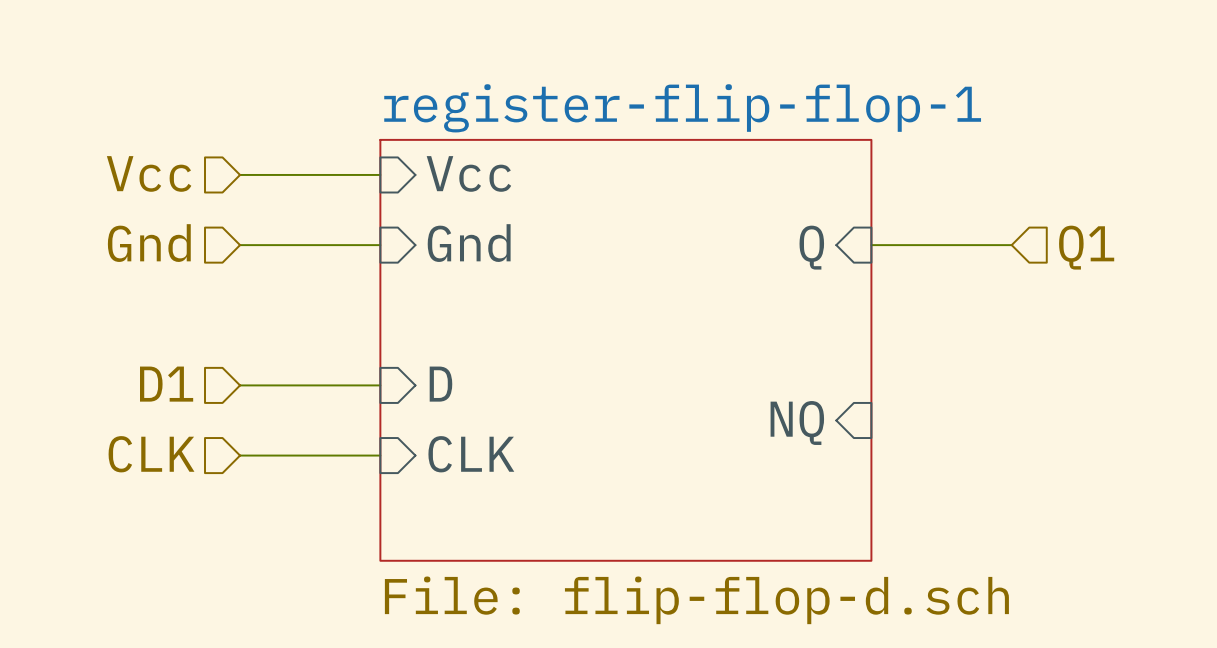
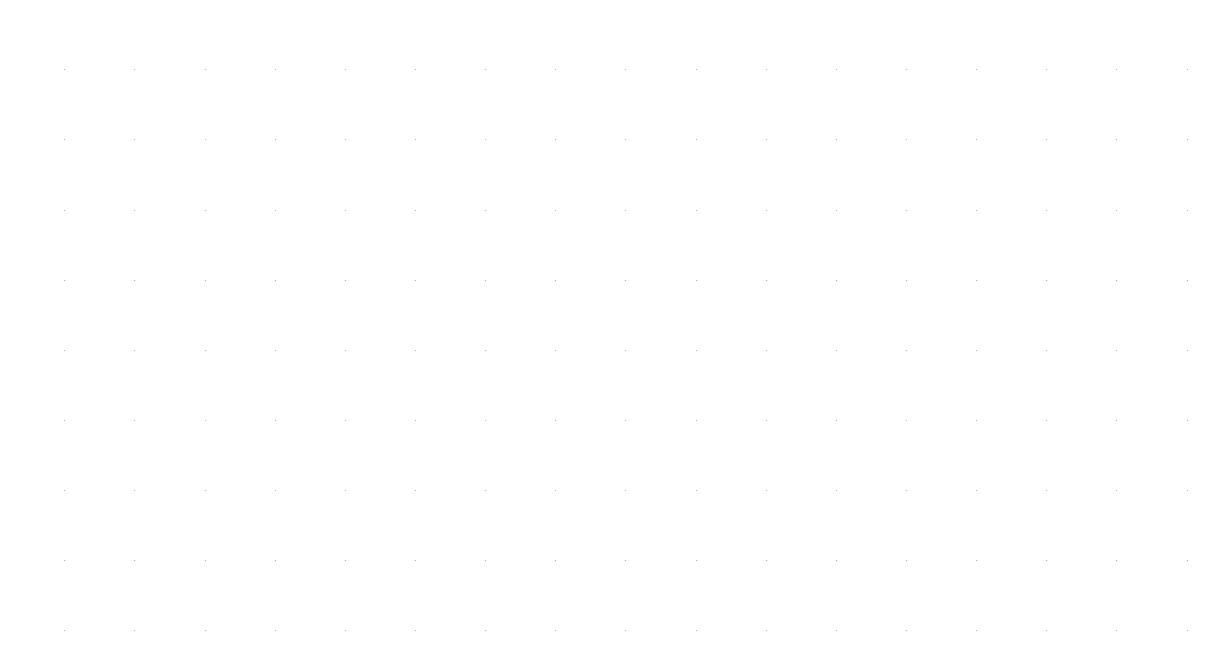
hierarchical label: Vcc (149, 173) -> none
sheet pin: Vcc (468, 173) -> none
wire: (240, 174) (380, 174) -> none
hierarchical label: Gnd (149, 243) -> none
sheet pin: Gnd (469, 243) -> none
wire: (240, 245) (380, 245) -> none
wire: (871, 245) (1011, 245) -> none
sheet pin: Q (811, 247) -> none
hierarchical label: Q1 (1086, 247) -> none
sheet register-flip-flop-1: File: flip-flop-d.sch (625, 350) -> none
hierarchical label: D1 (166, 384) -> none
sheet pin: D (440, 384) -> none
wire: (240, 385) (380, 385) -> none
sheet pin: NQ (797, 422) -> none
hierarchical label: CLK (151, 454) -> none
sheet pin: CLK (471, 454) -> none
wire: (240, 455) (380, 455) -> none

